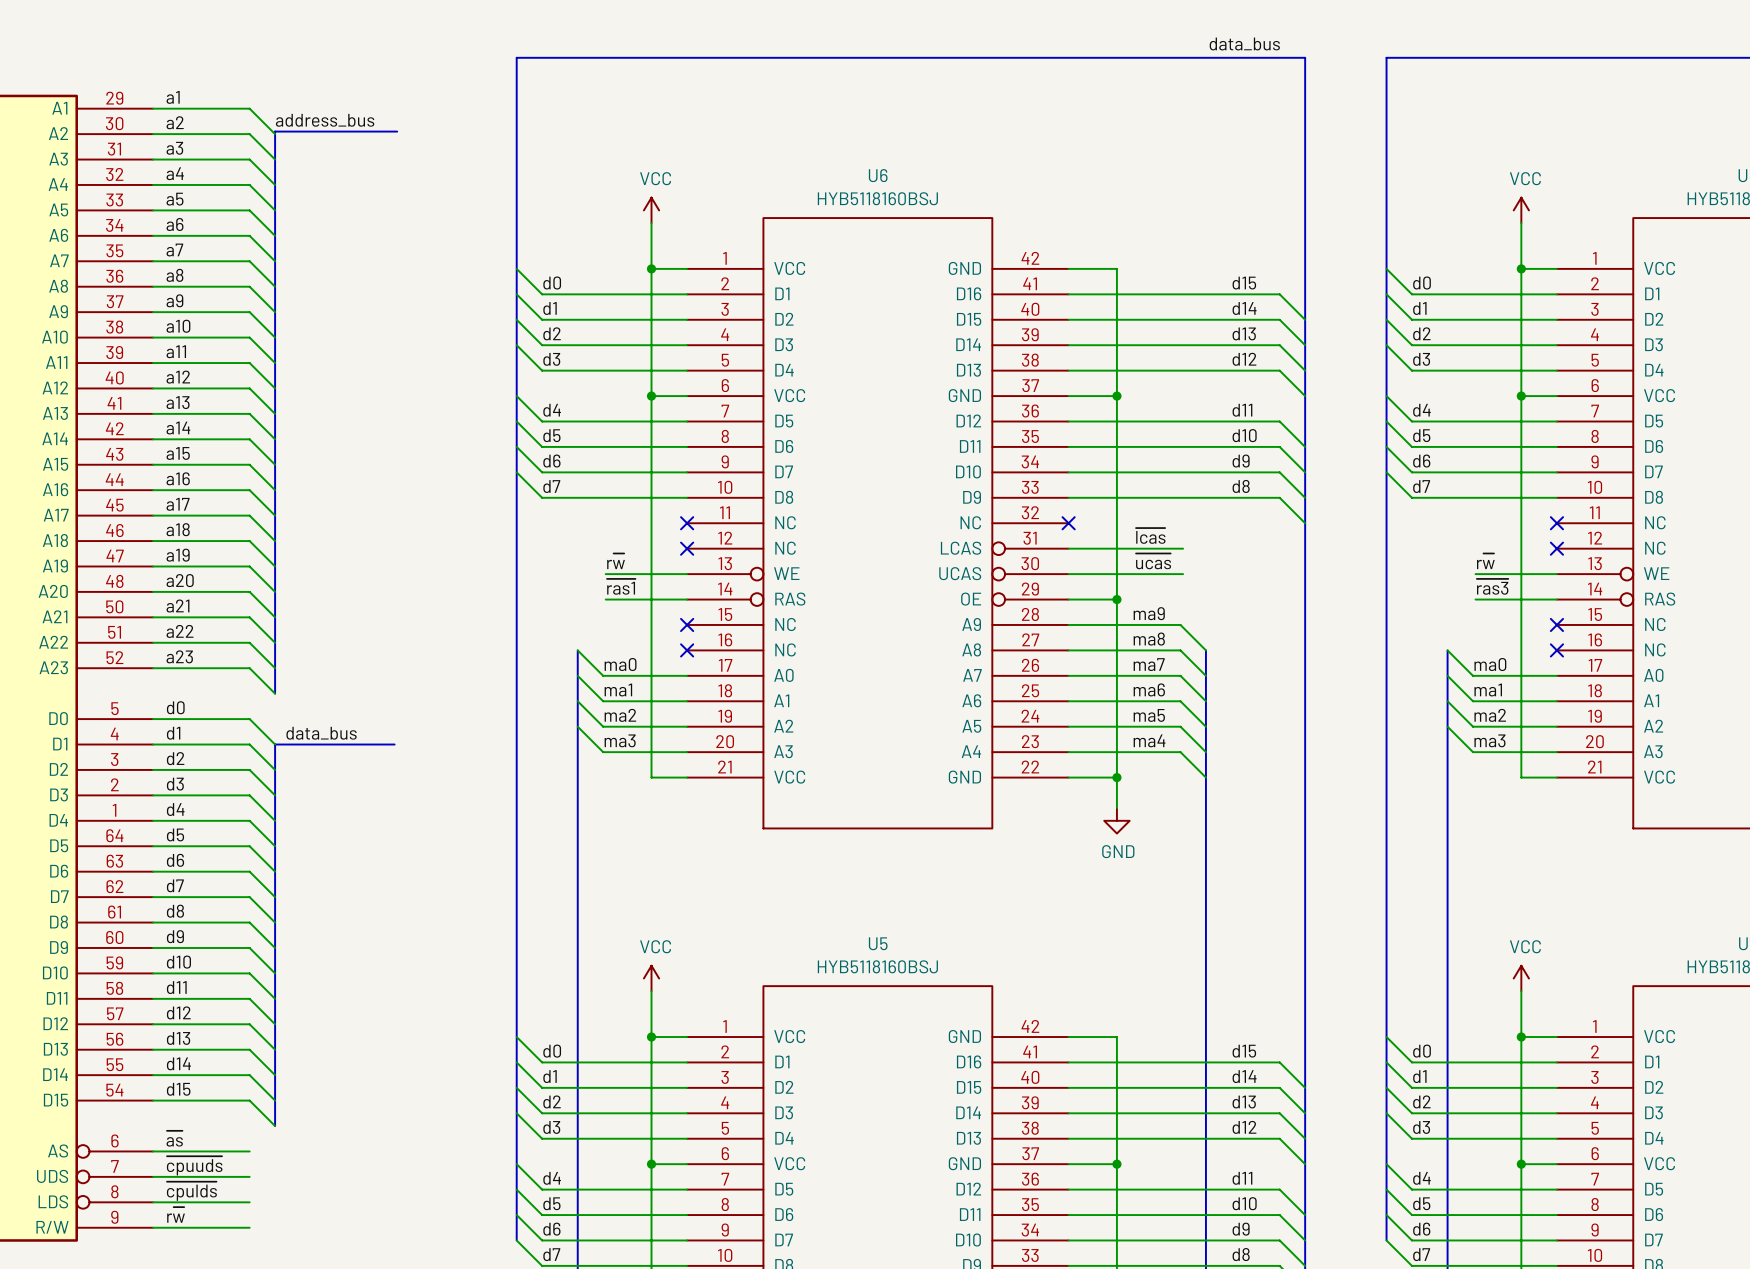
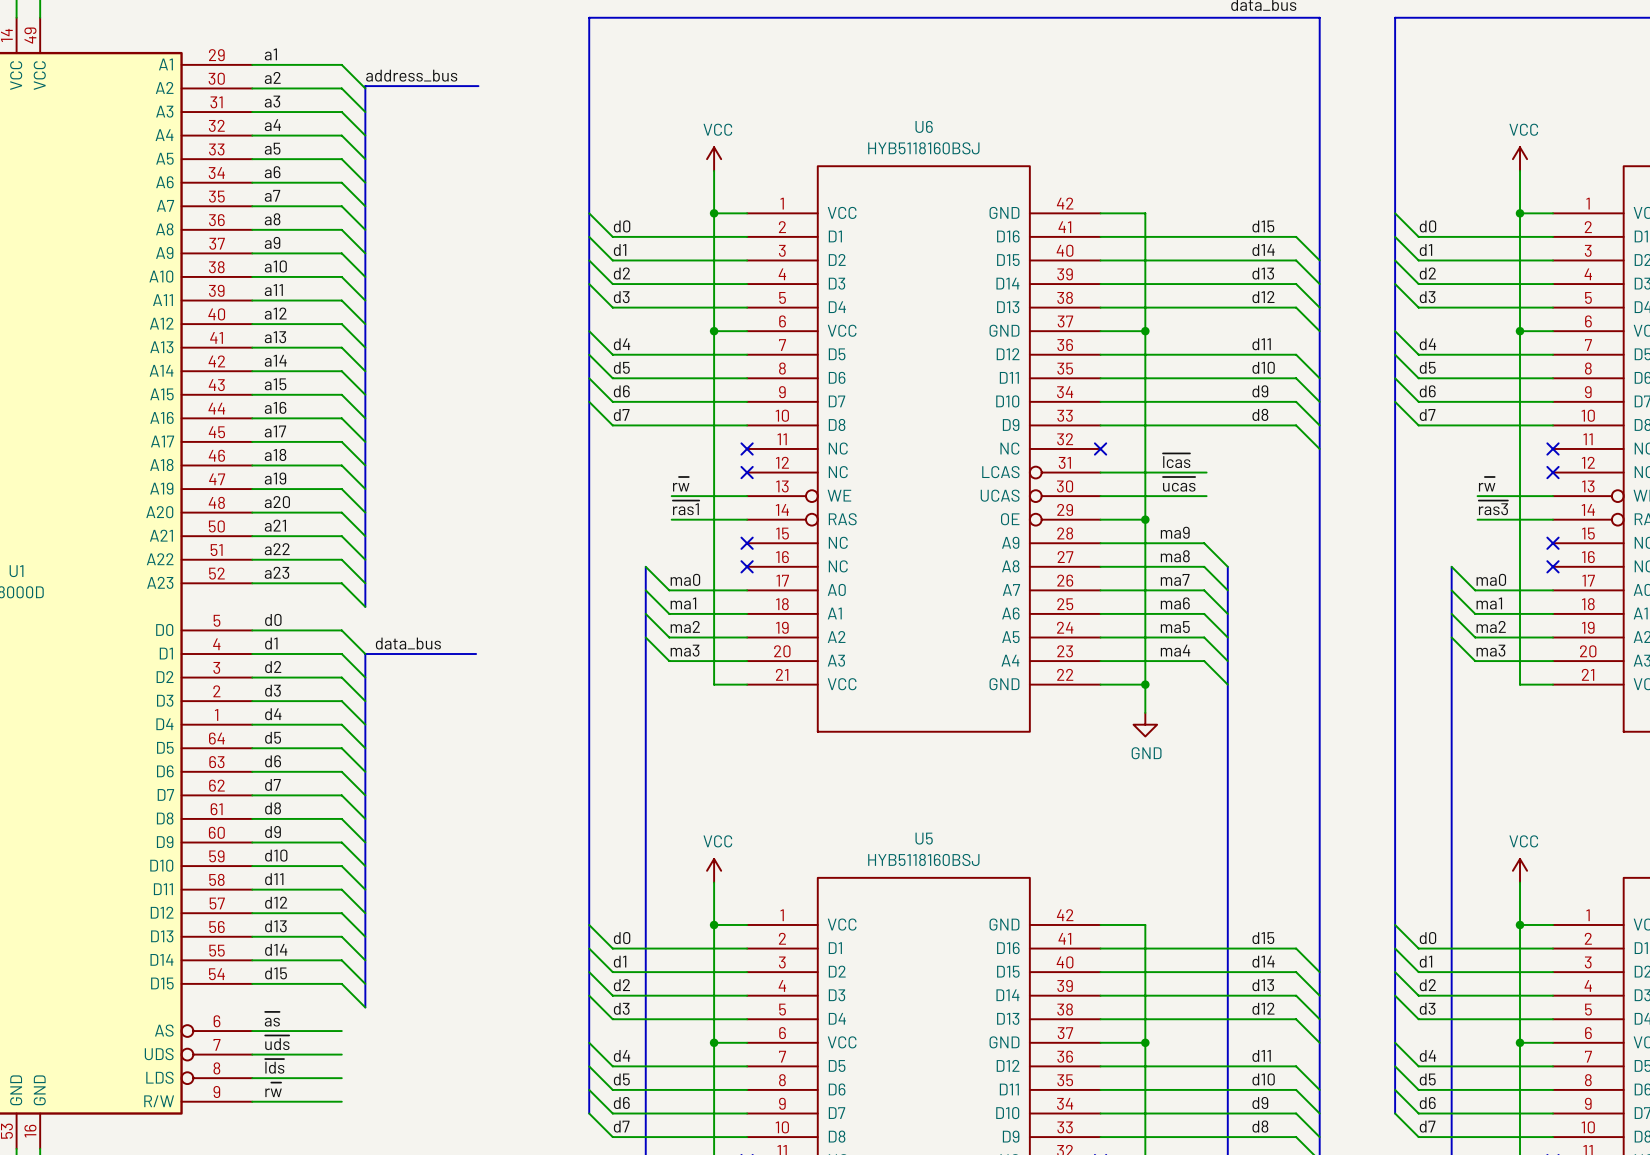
label: ~{cpuuds} (194, 1165) -> ~{uds} (277, 1042)
label: ~{cpulds} (191, 1191) -> ~{lds} (274, 1066)

